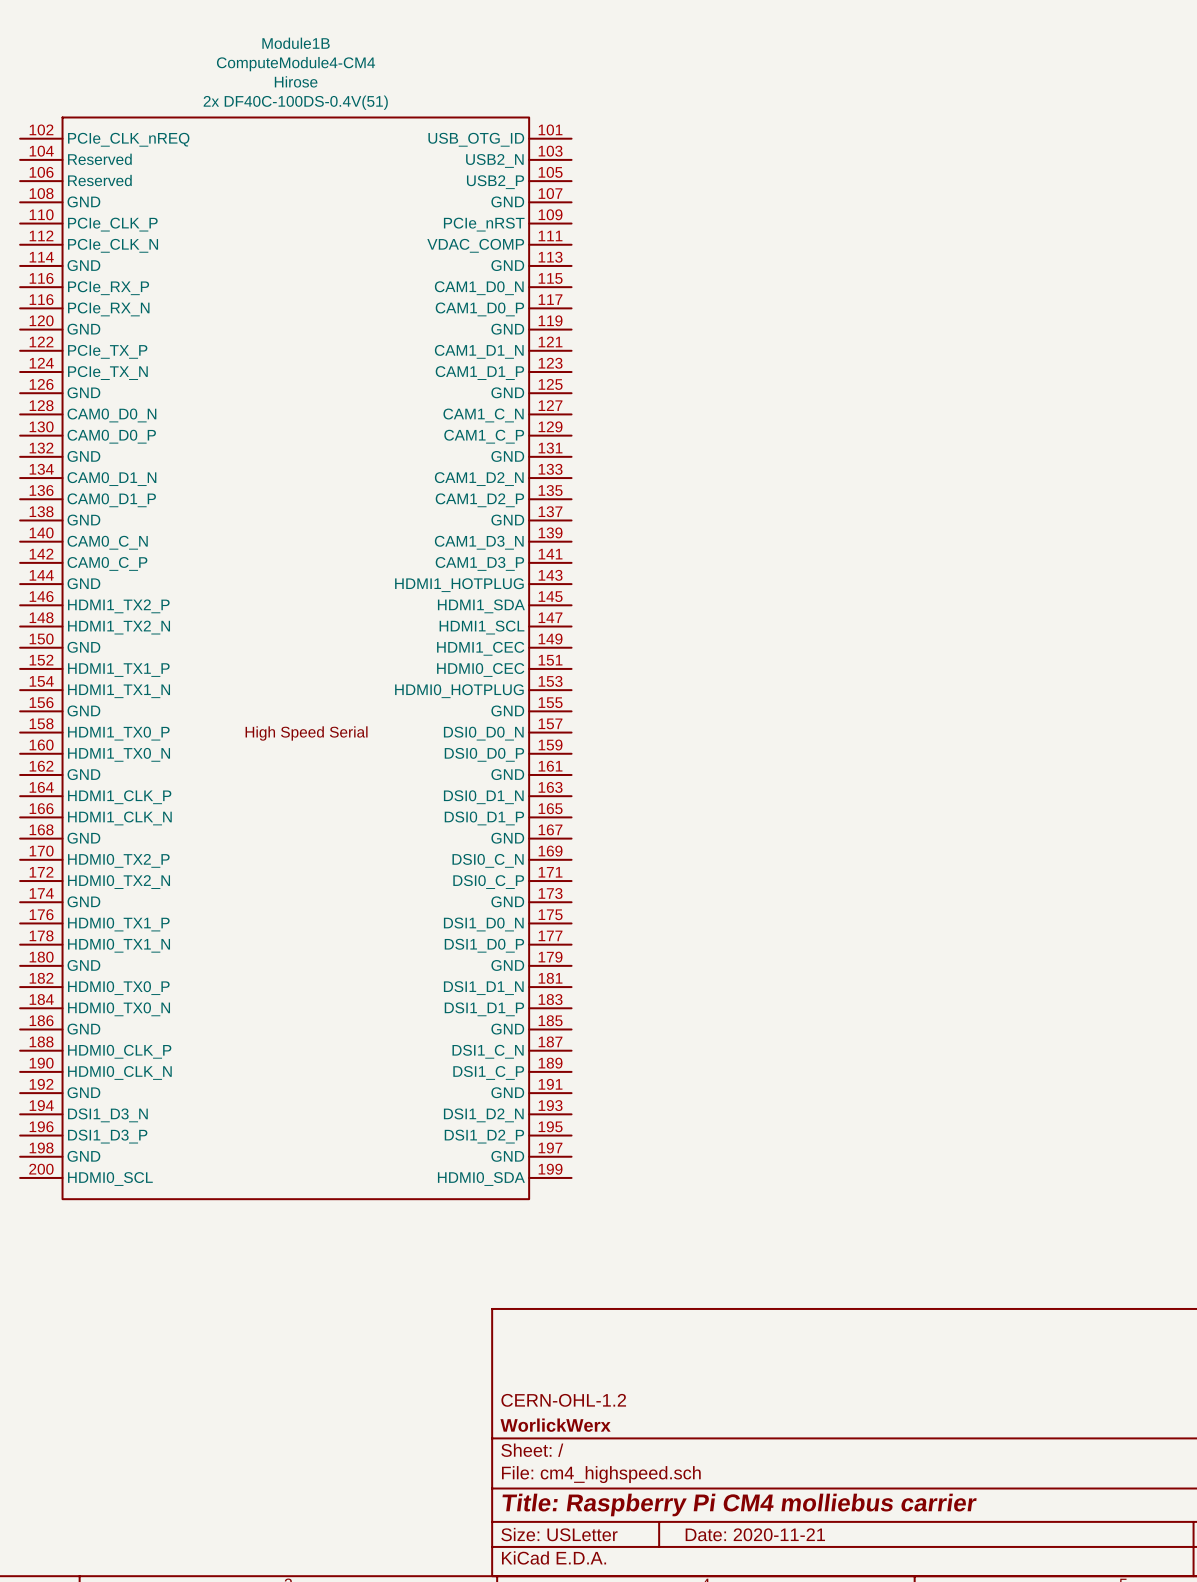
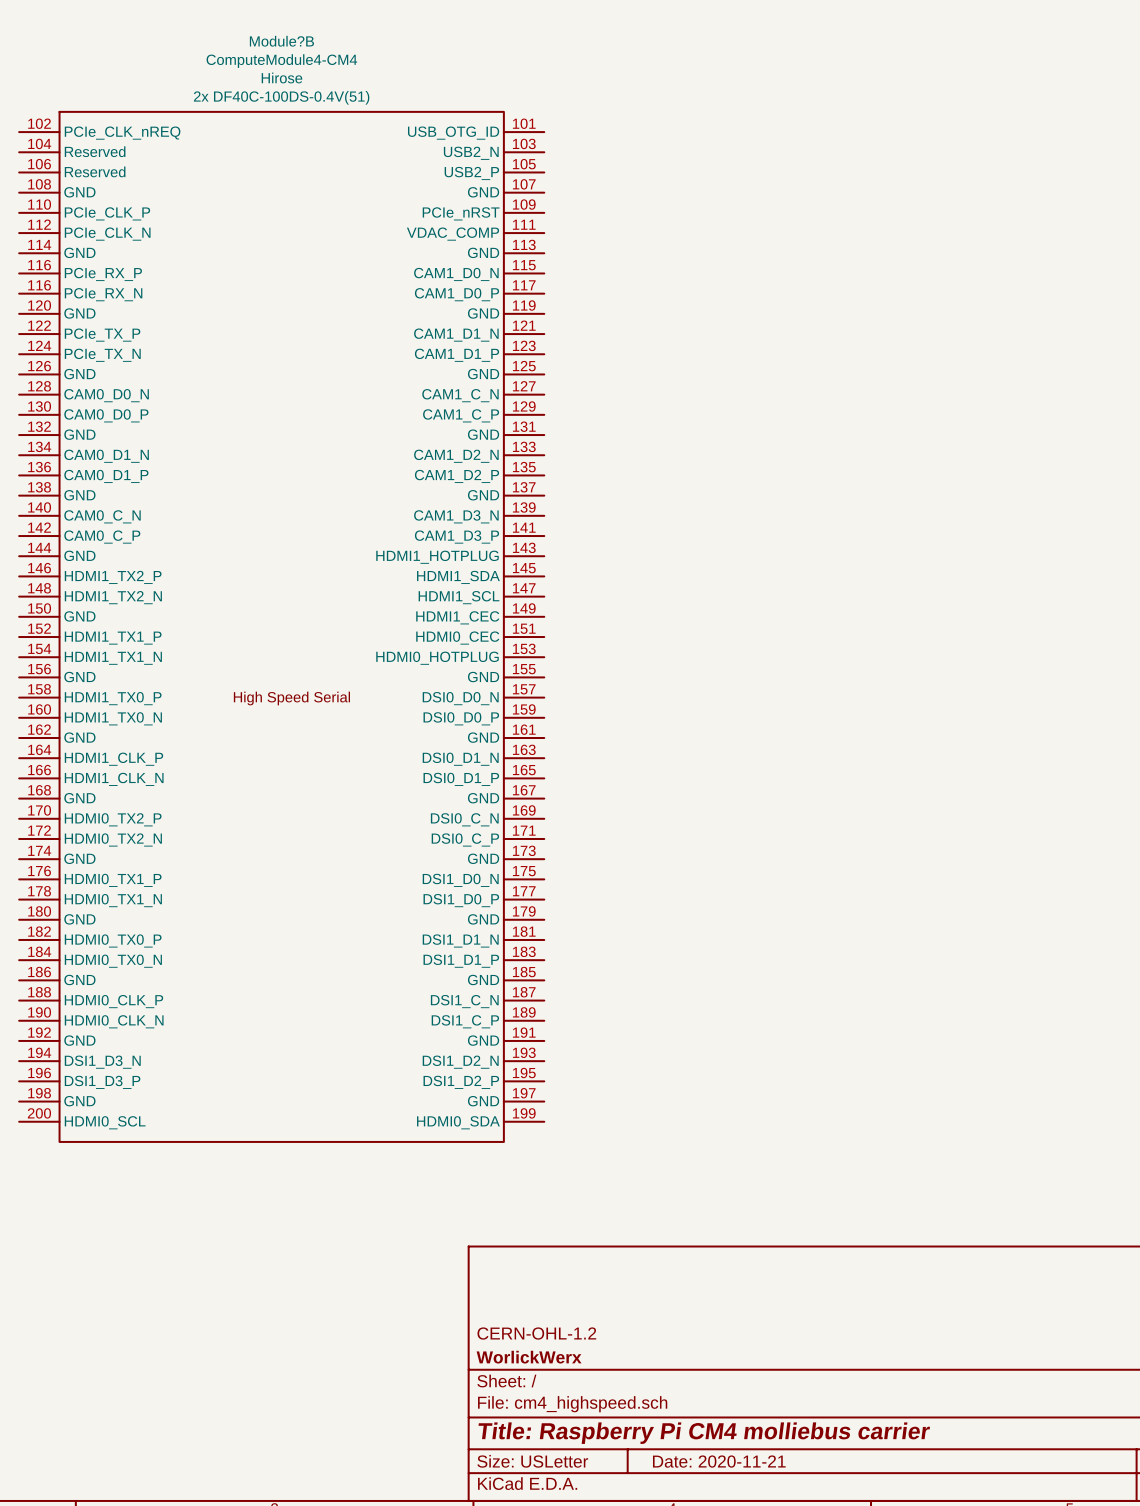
Module1B name: Module1B (296, 43) -> Module?B (281, 41)

